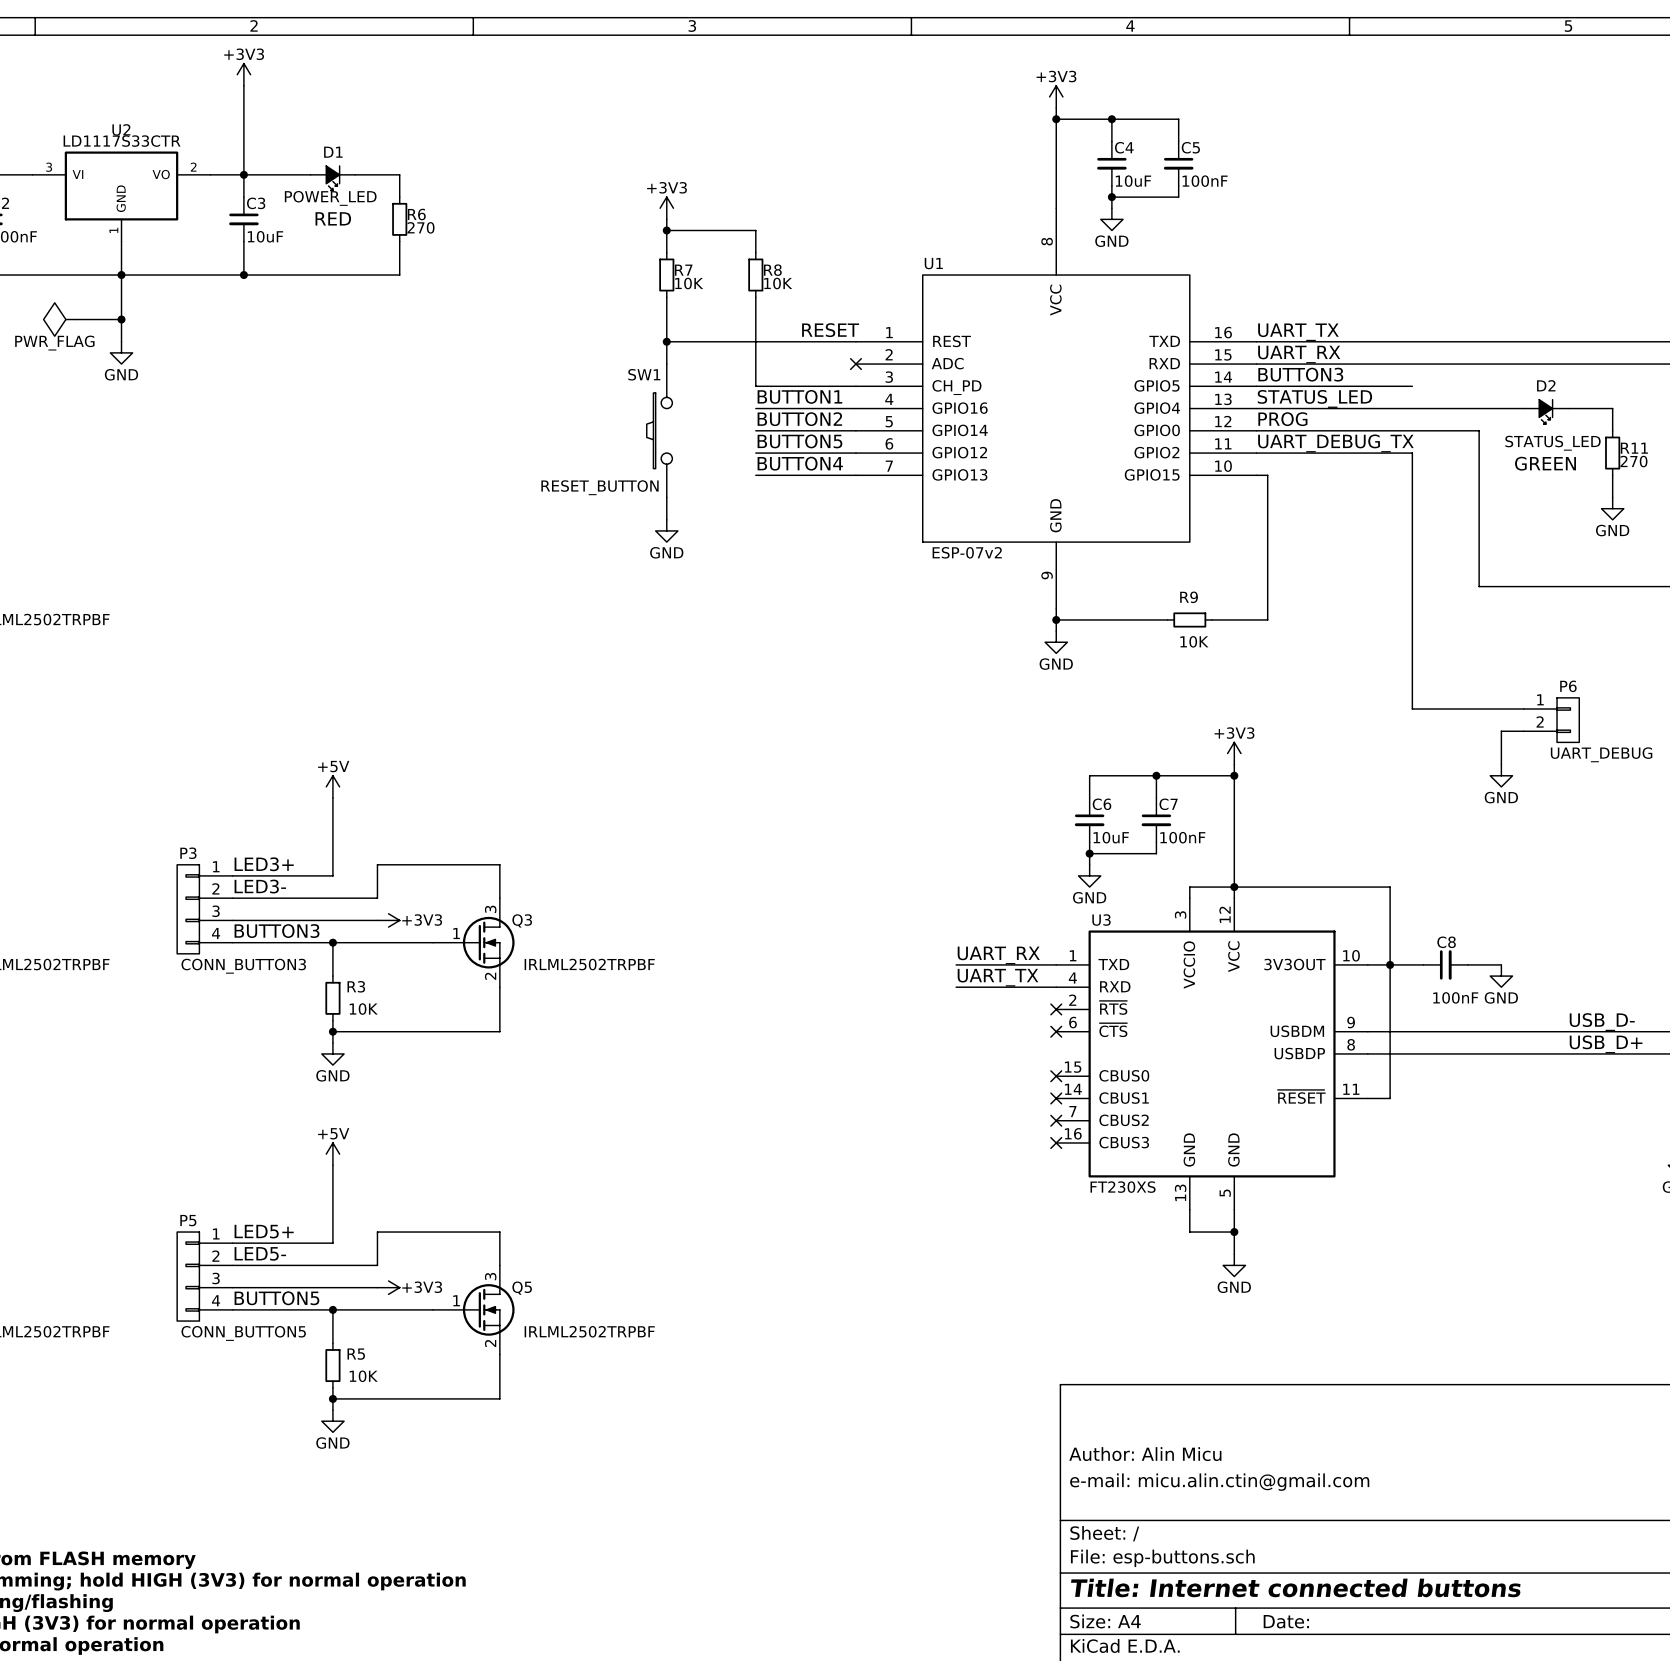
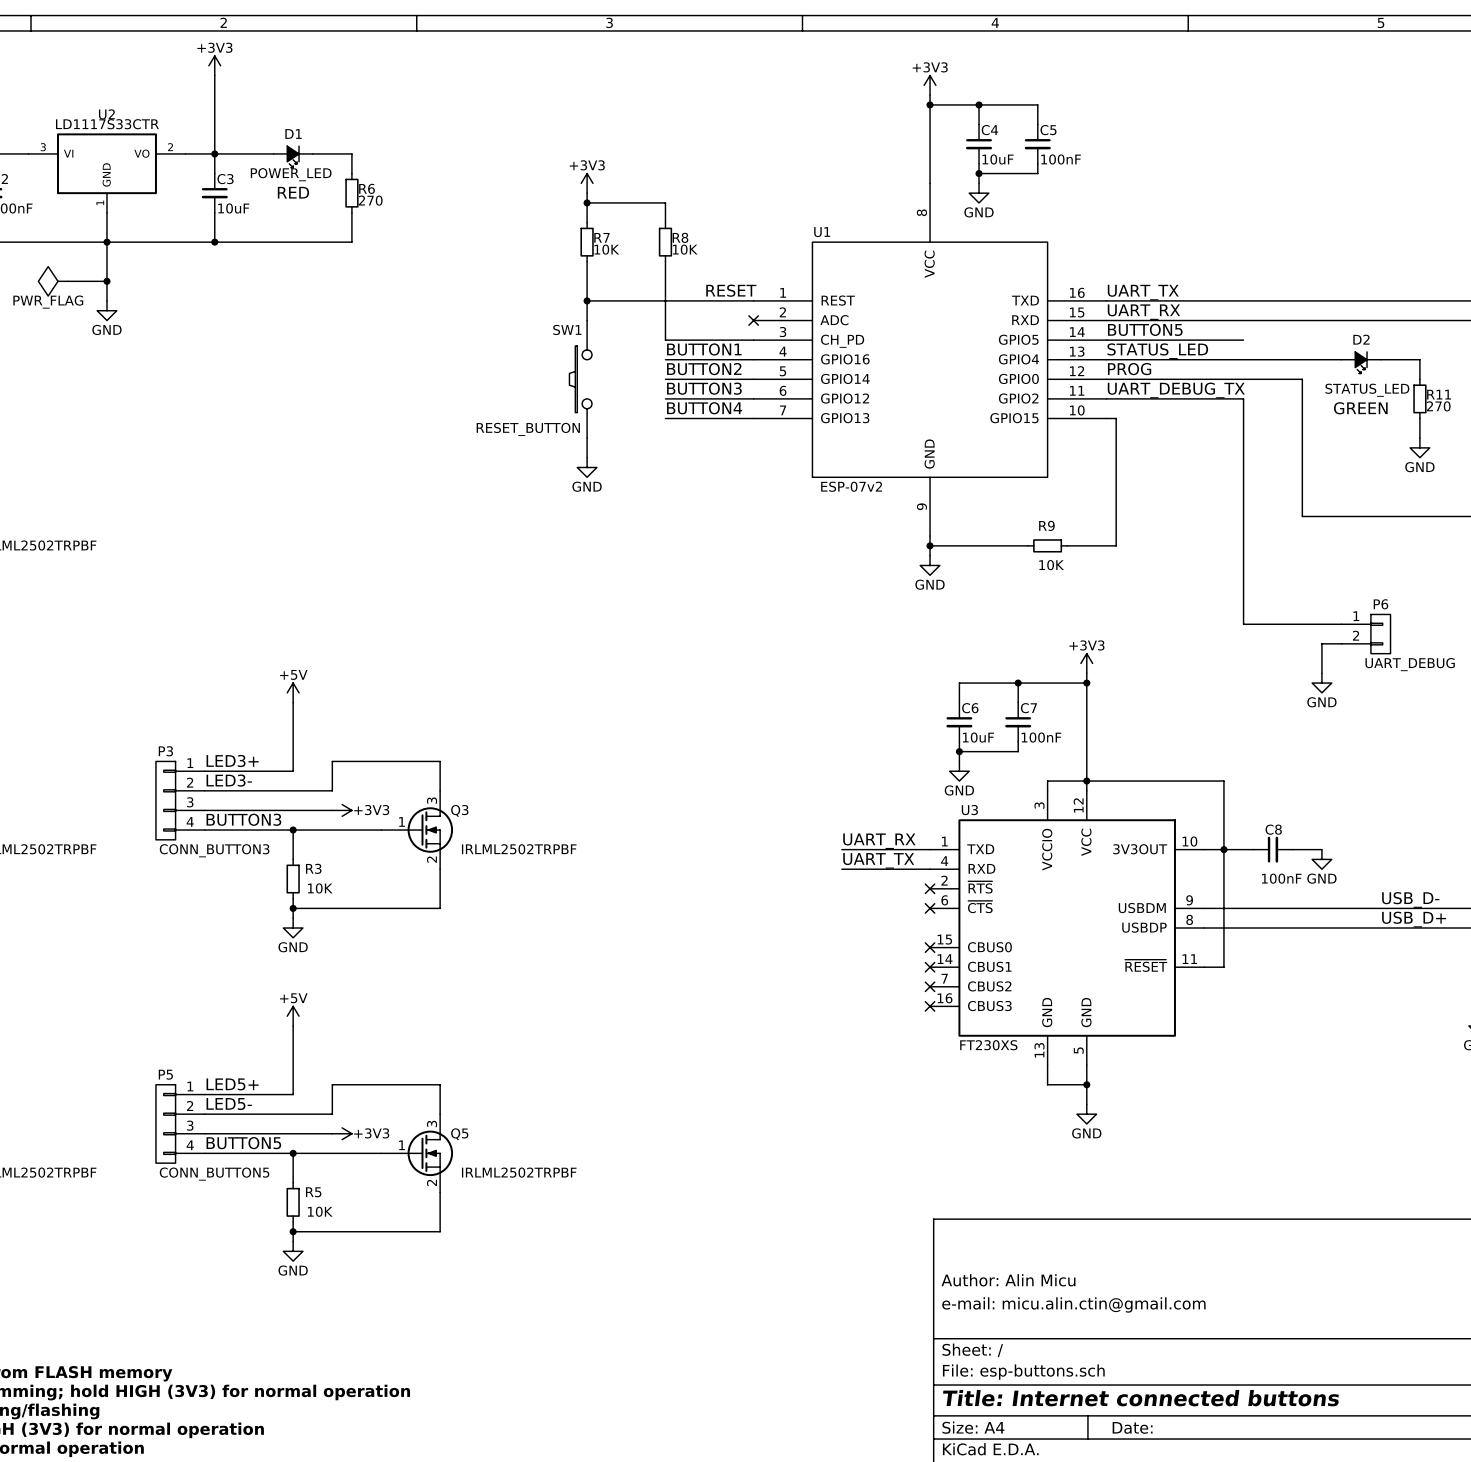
label: BUTTON3 (1300, 374) -> BUTTON5 (1145, 329)
label: BUTTON5 (799, 441) -> BUTTON3 (704, 388)

